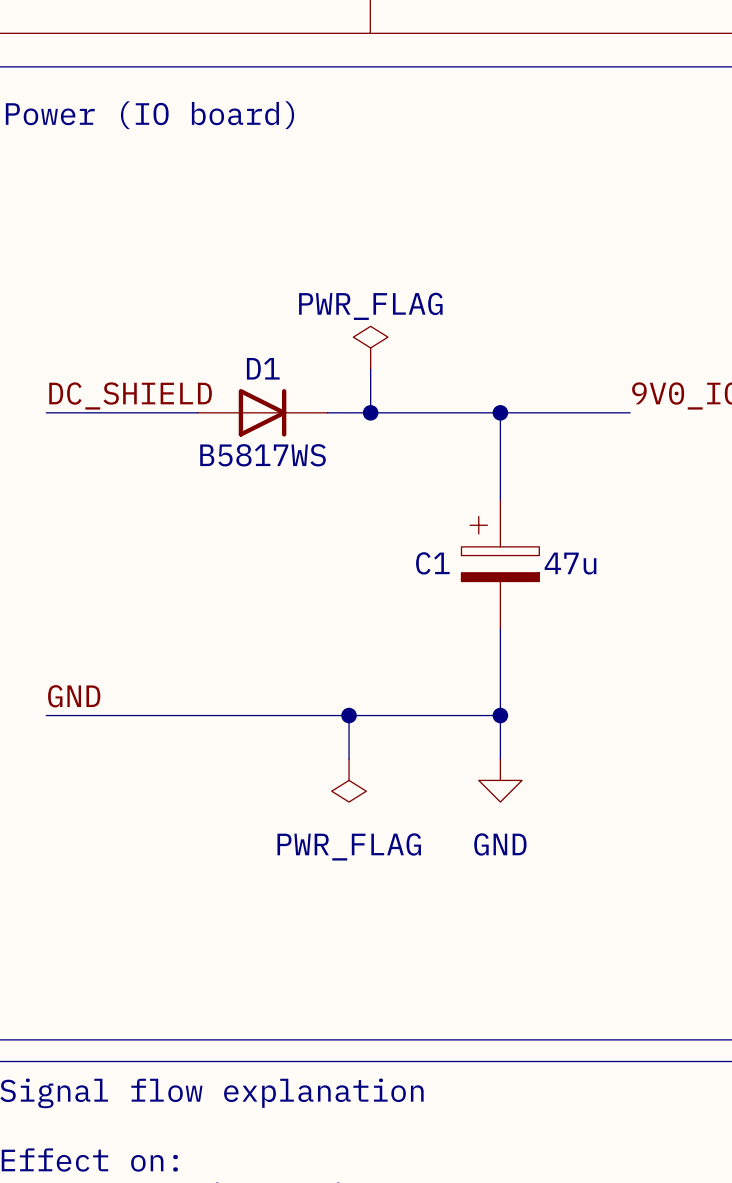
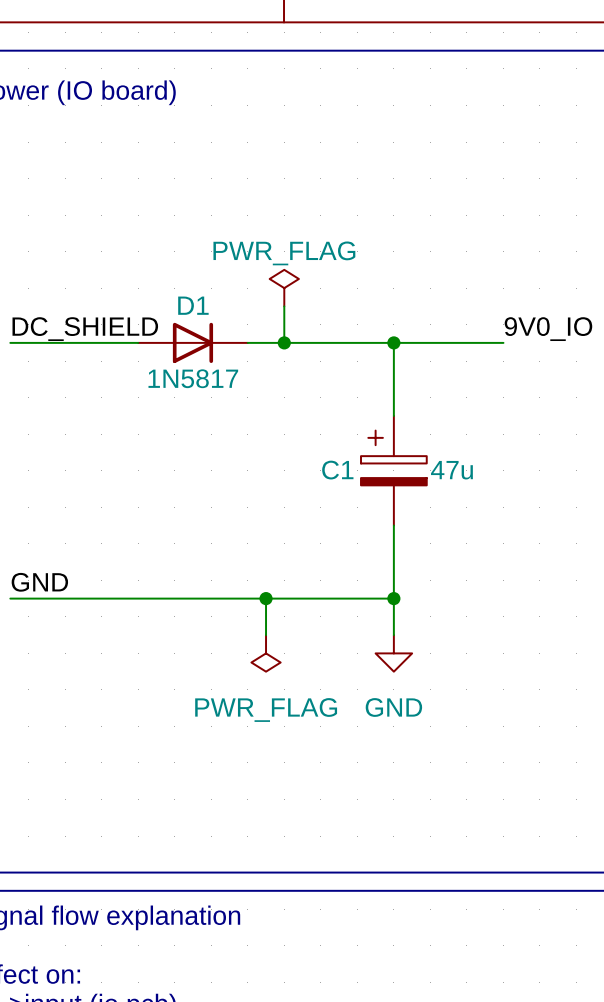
D1 value: B5817WS (263, 455) -> 1N5817 (193, 378)

